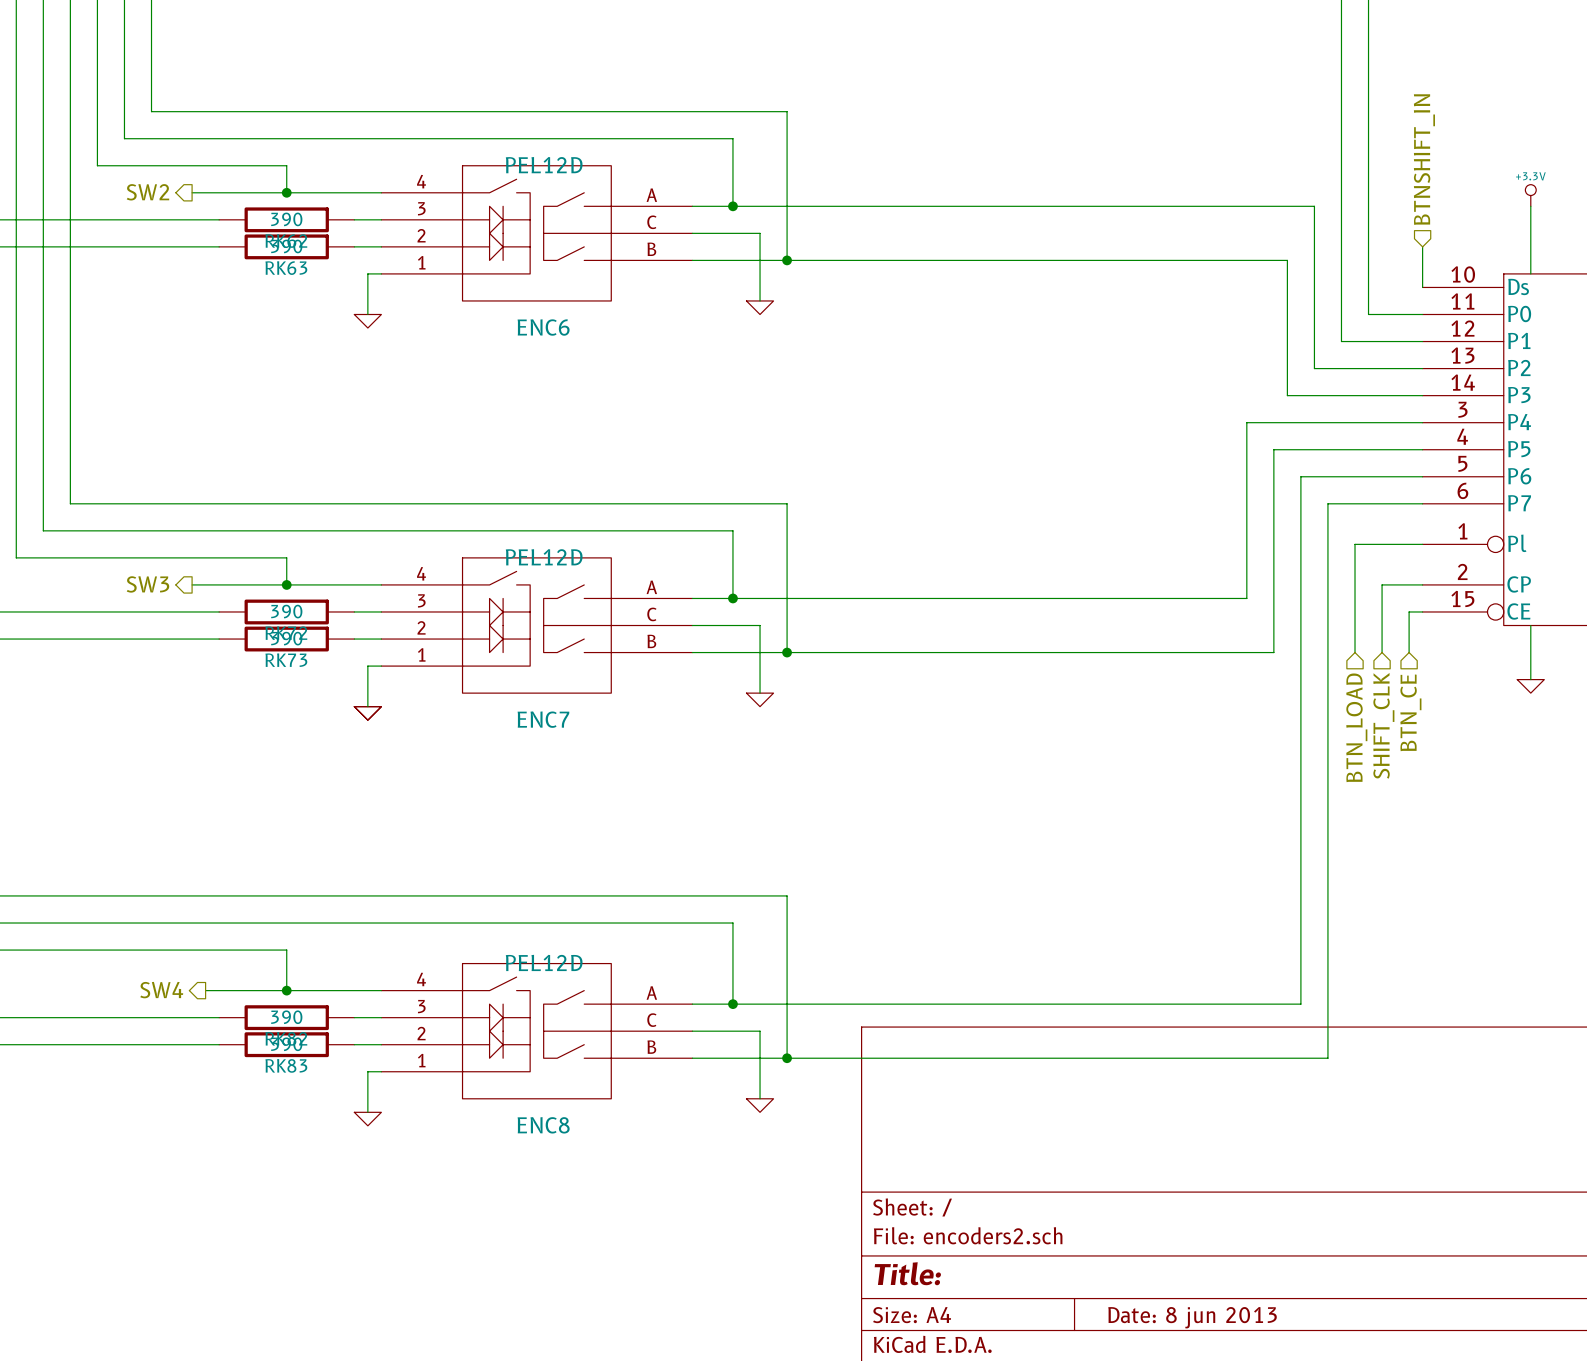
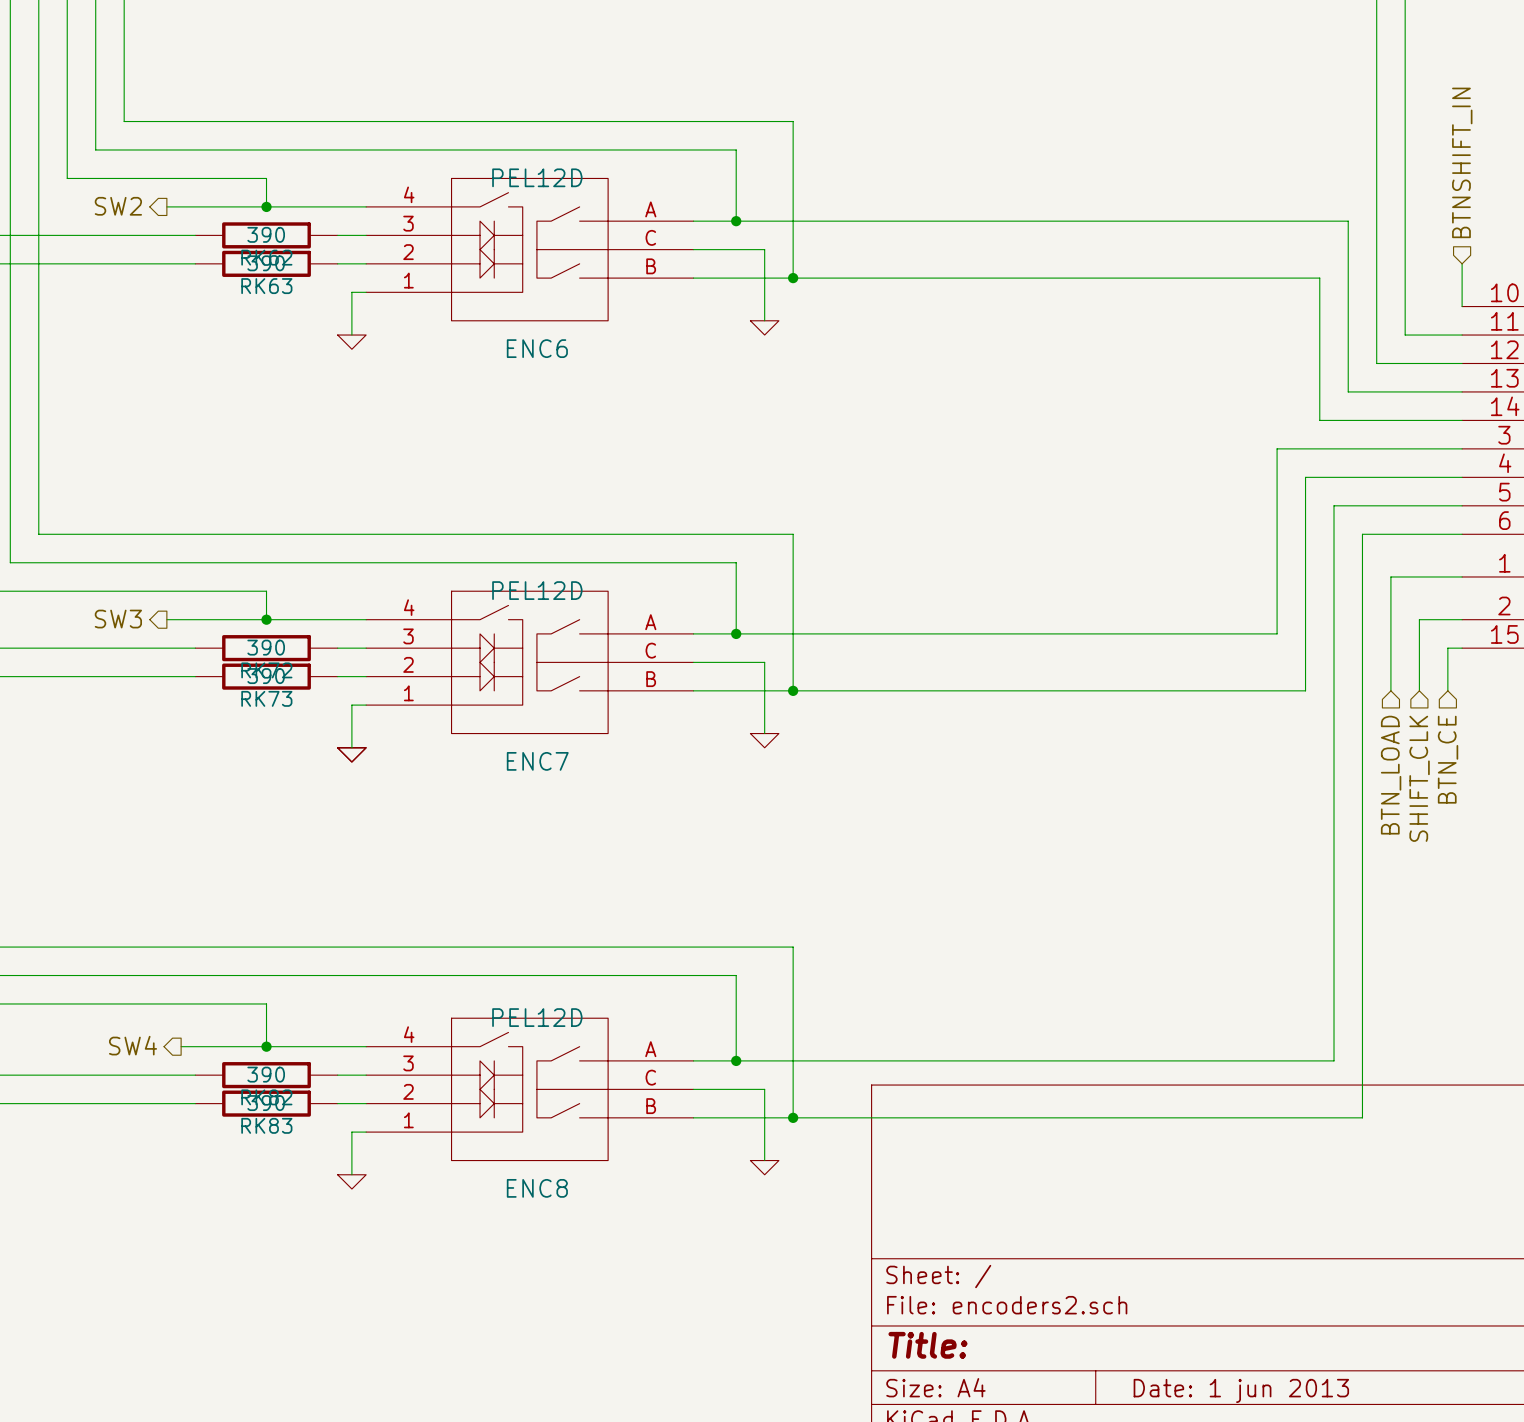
title block: Date: 8 jun 2013 (1192, 1317) -> Date: 1 jun 2013 (1241, 1390)

